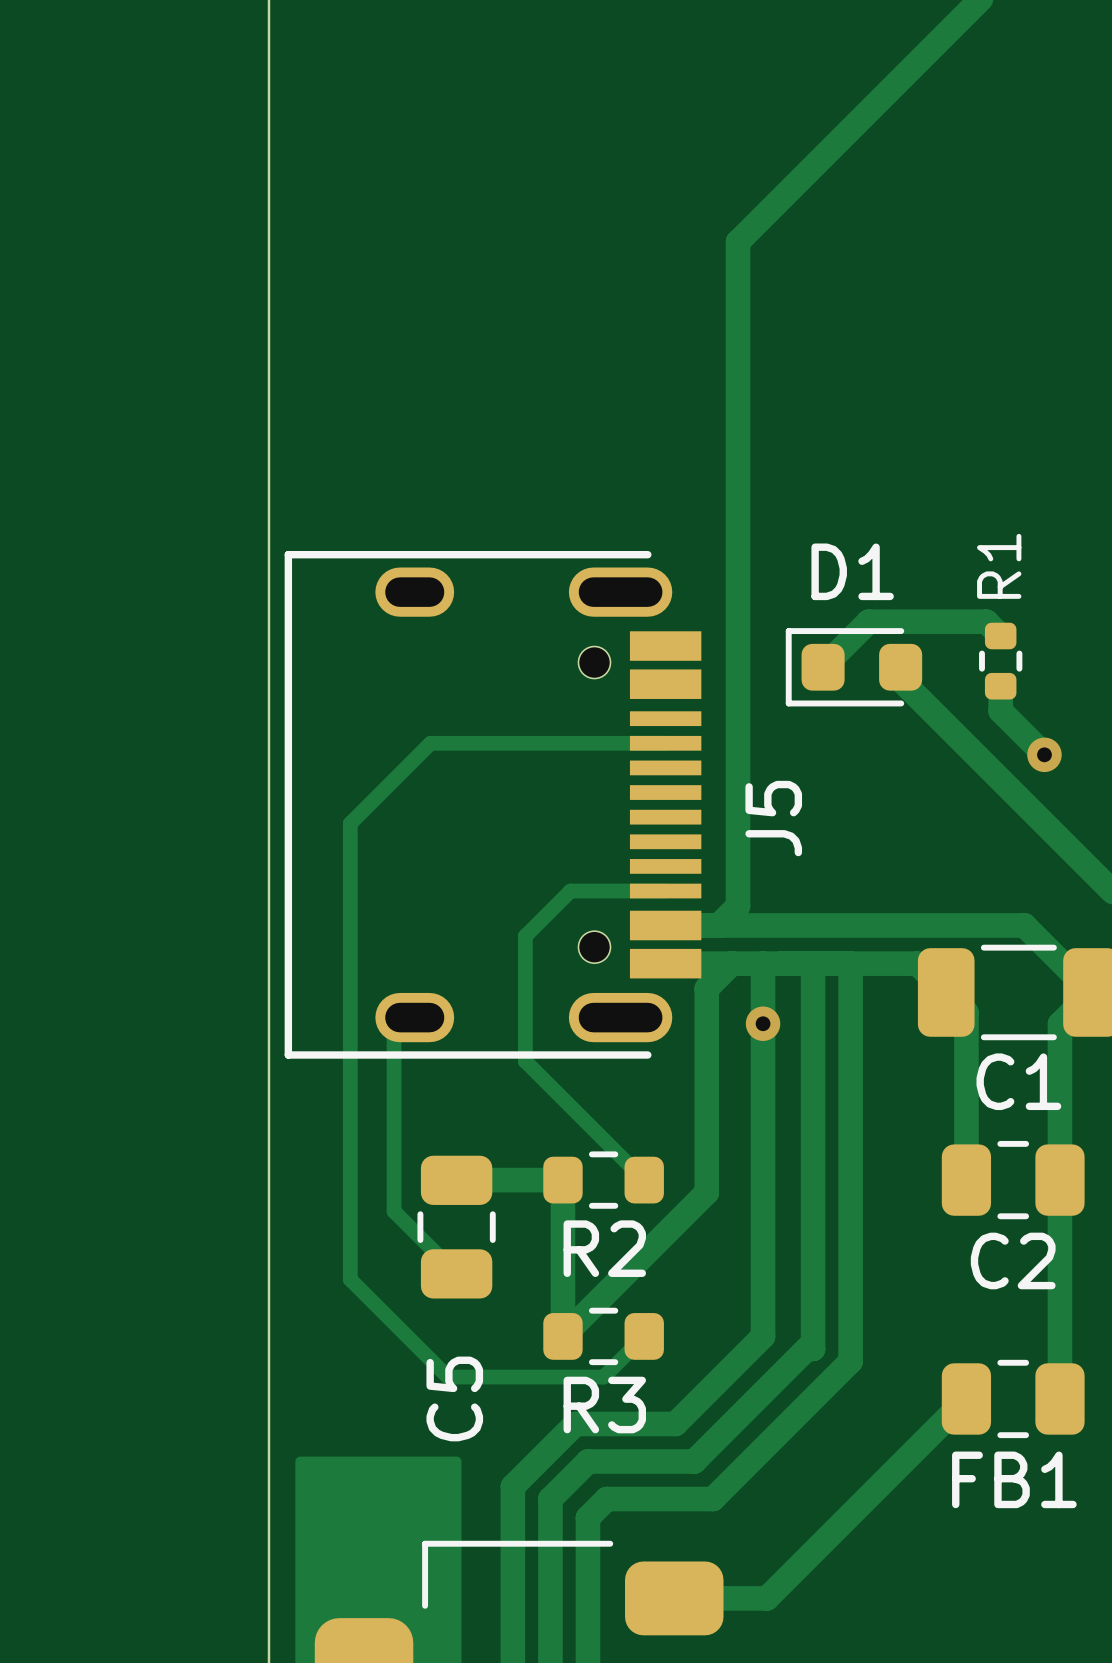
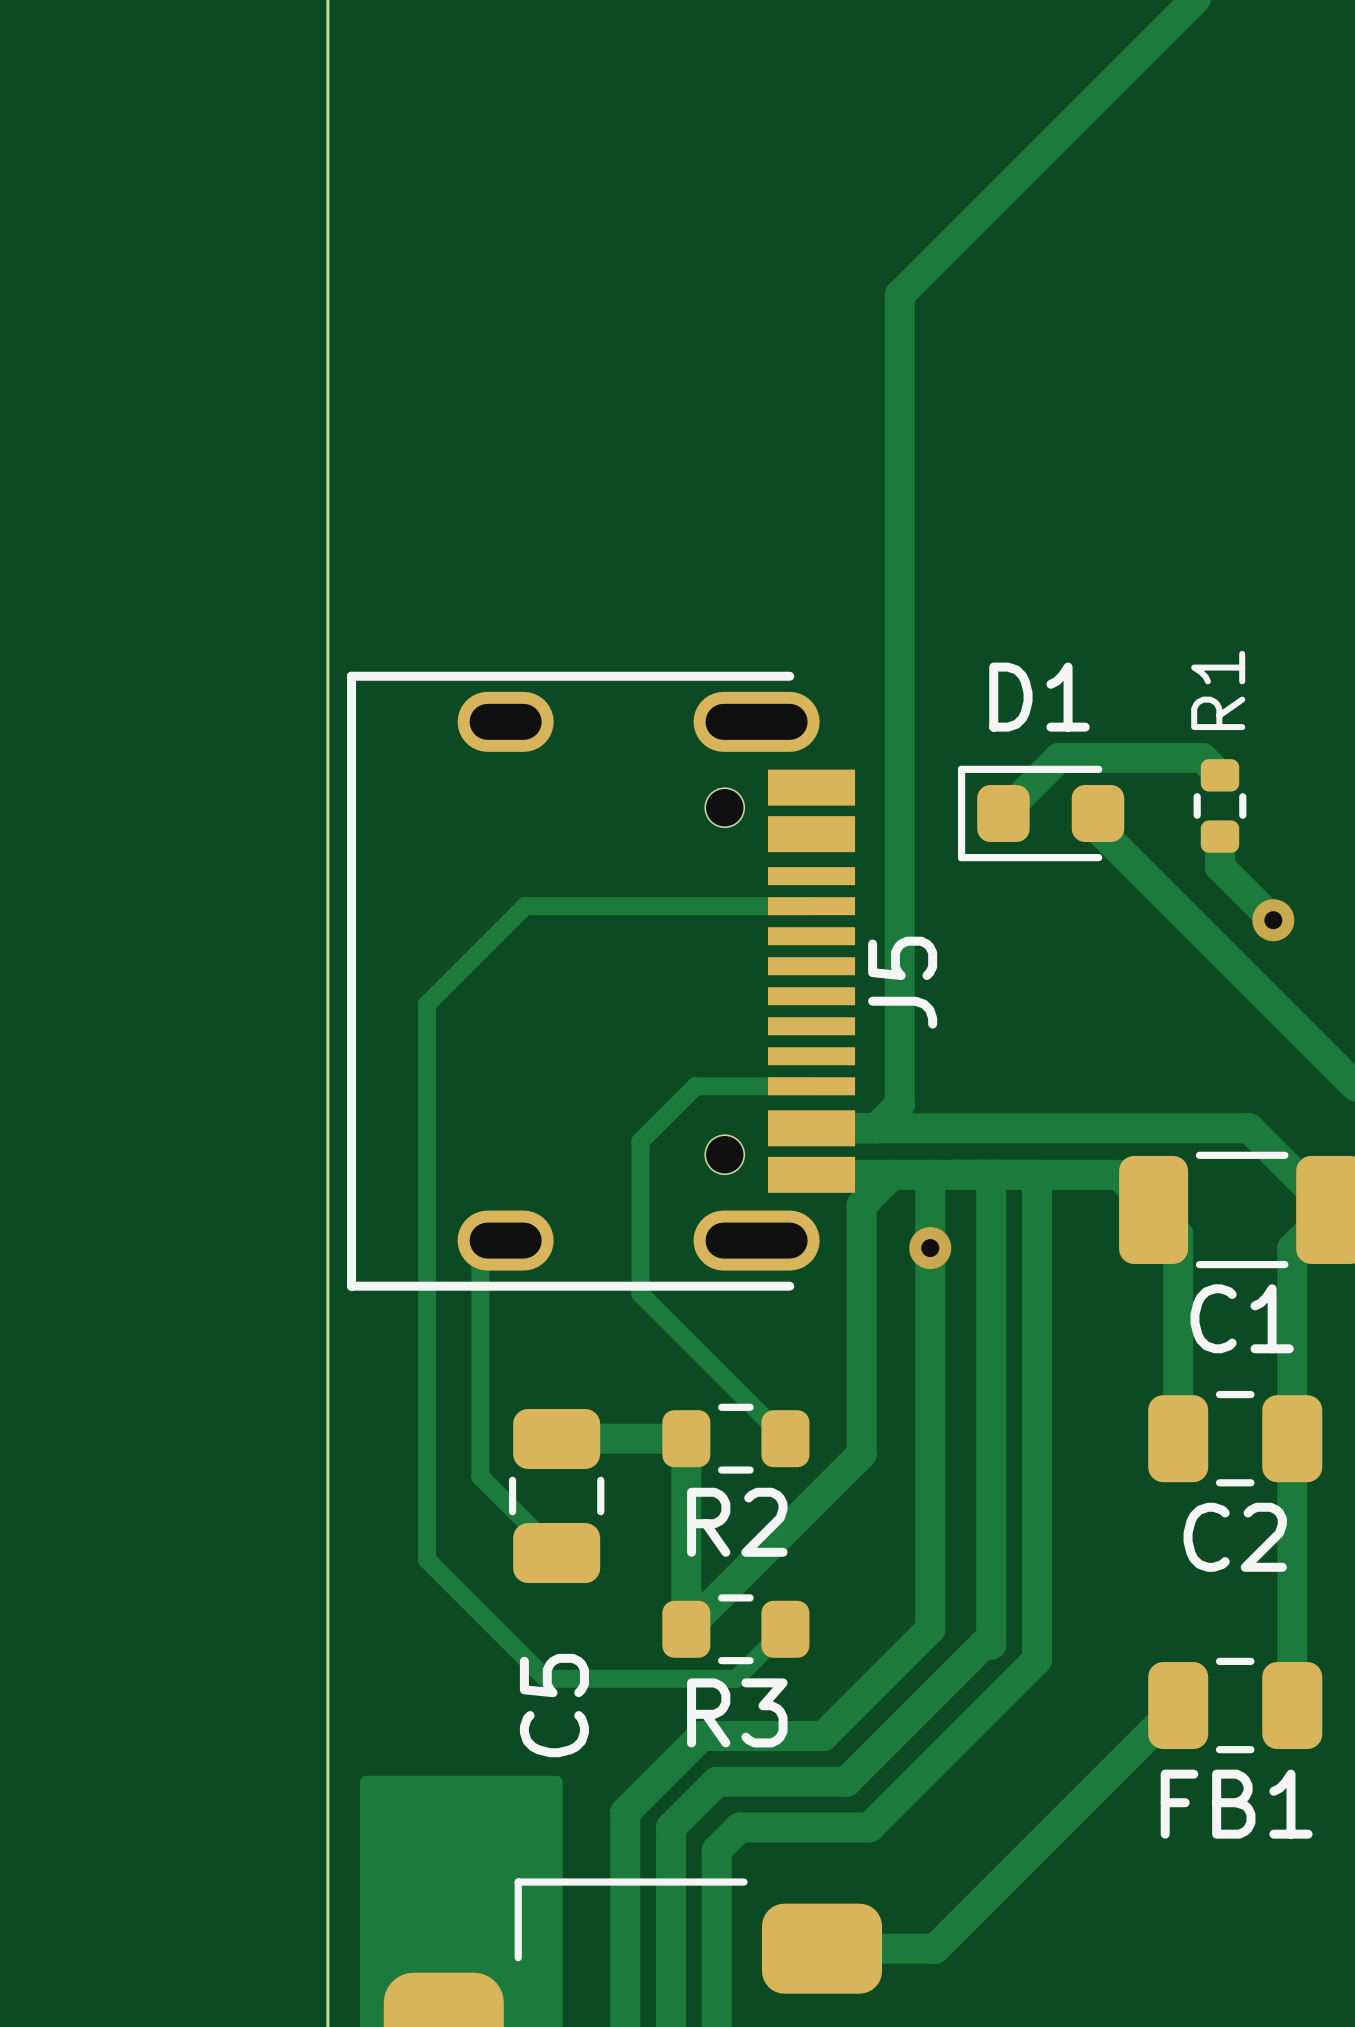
J5 name position: J5 (773, 818) -> J5 (902, 982)

